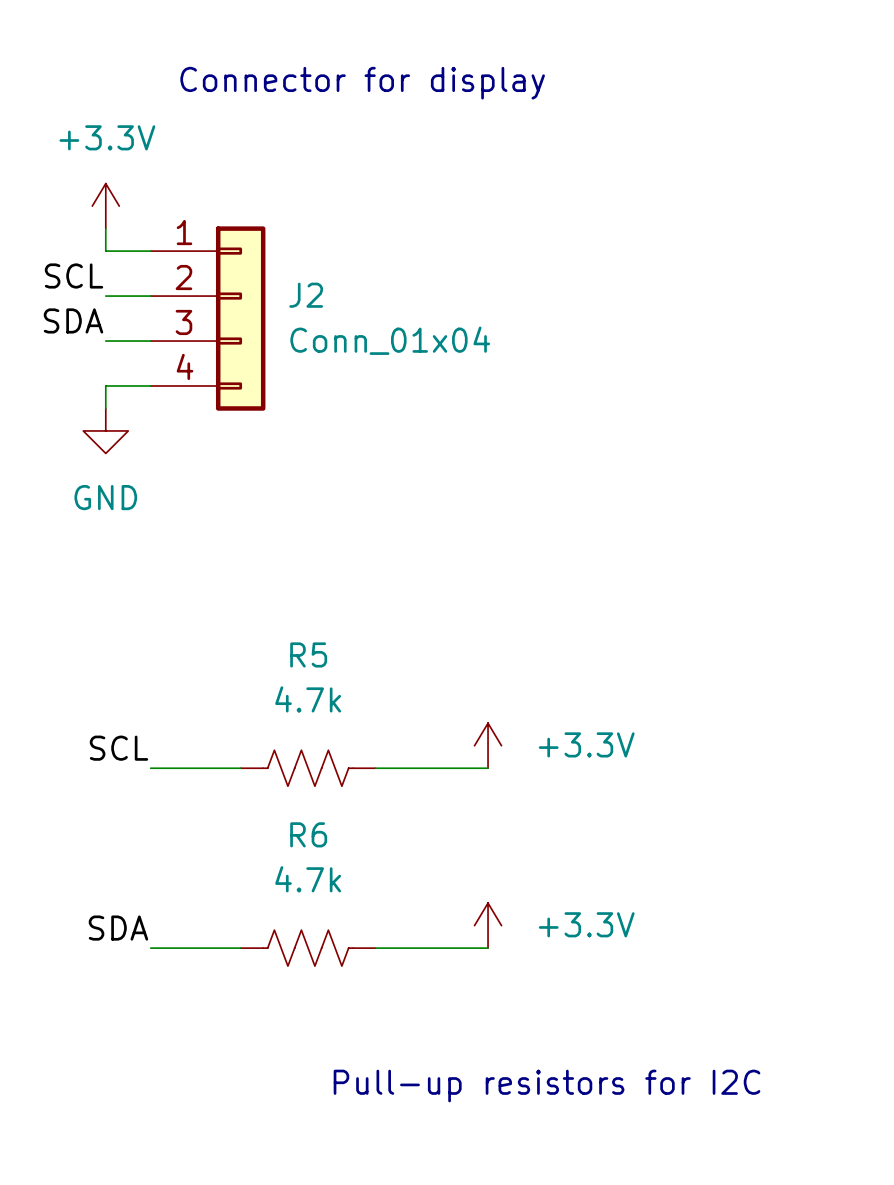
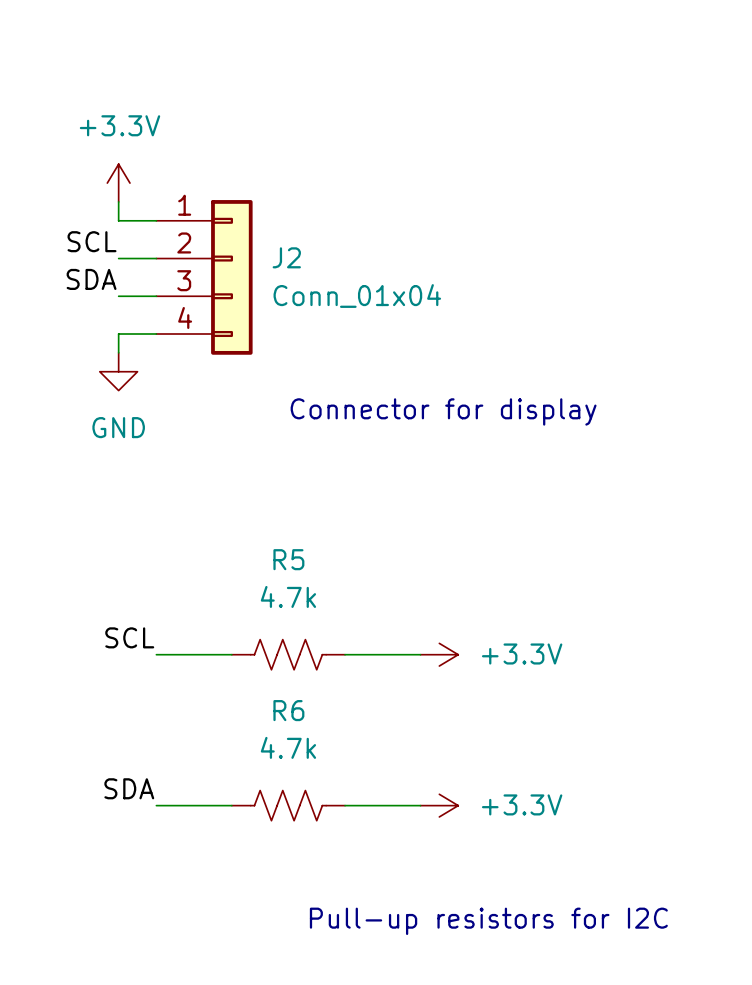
text position: Connector for display (362, 83) -> Connector for display (443, 411)
power symbol rotation: 0° (488, 745) -> 90° clockwise (439, 654)
power symbol rotation: 0° (488, 925) -> 90° clockwise (439, 805)

